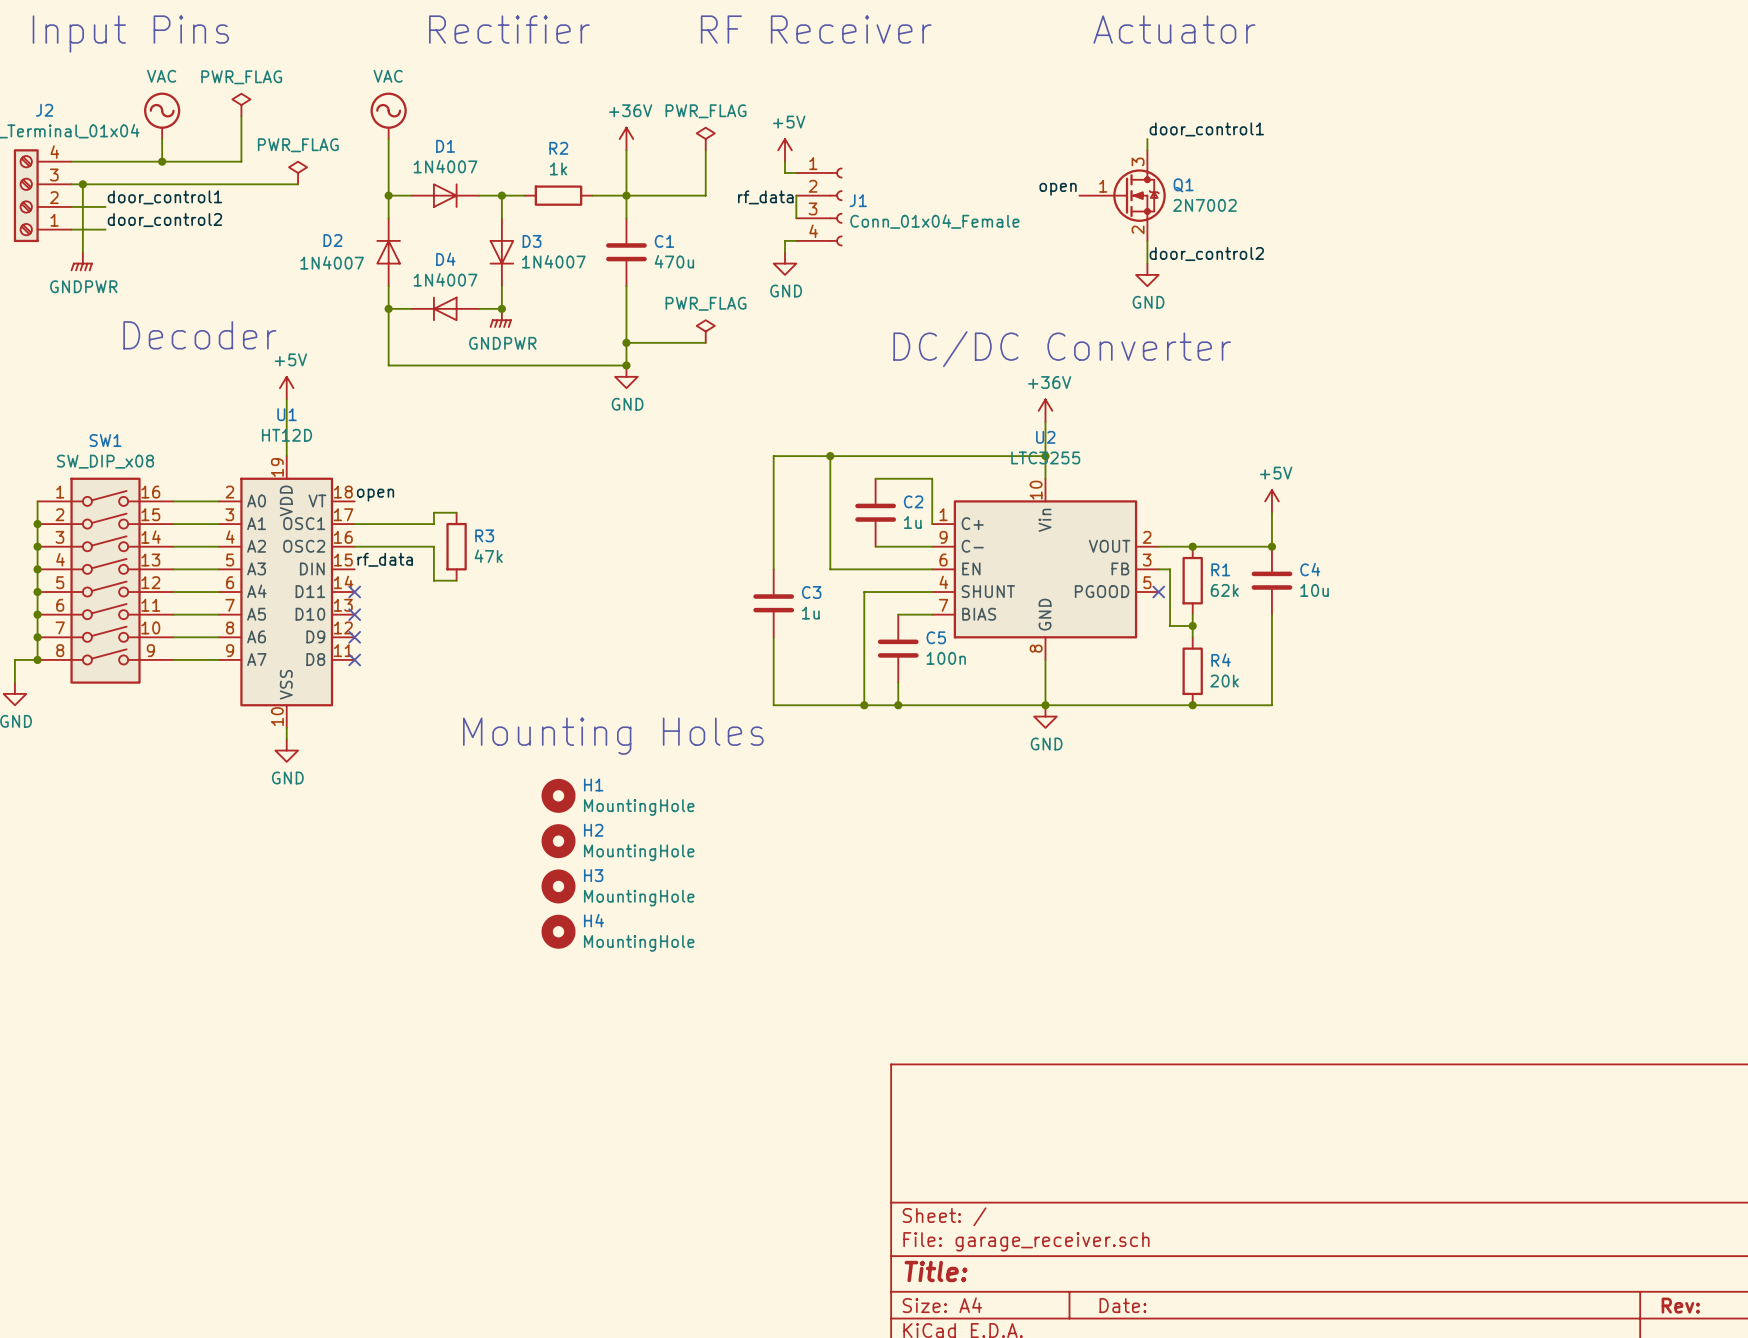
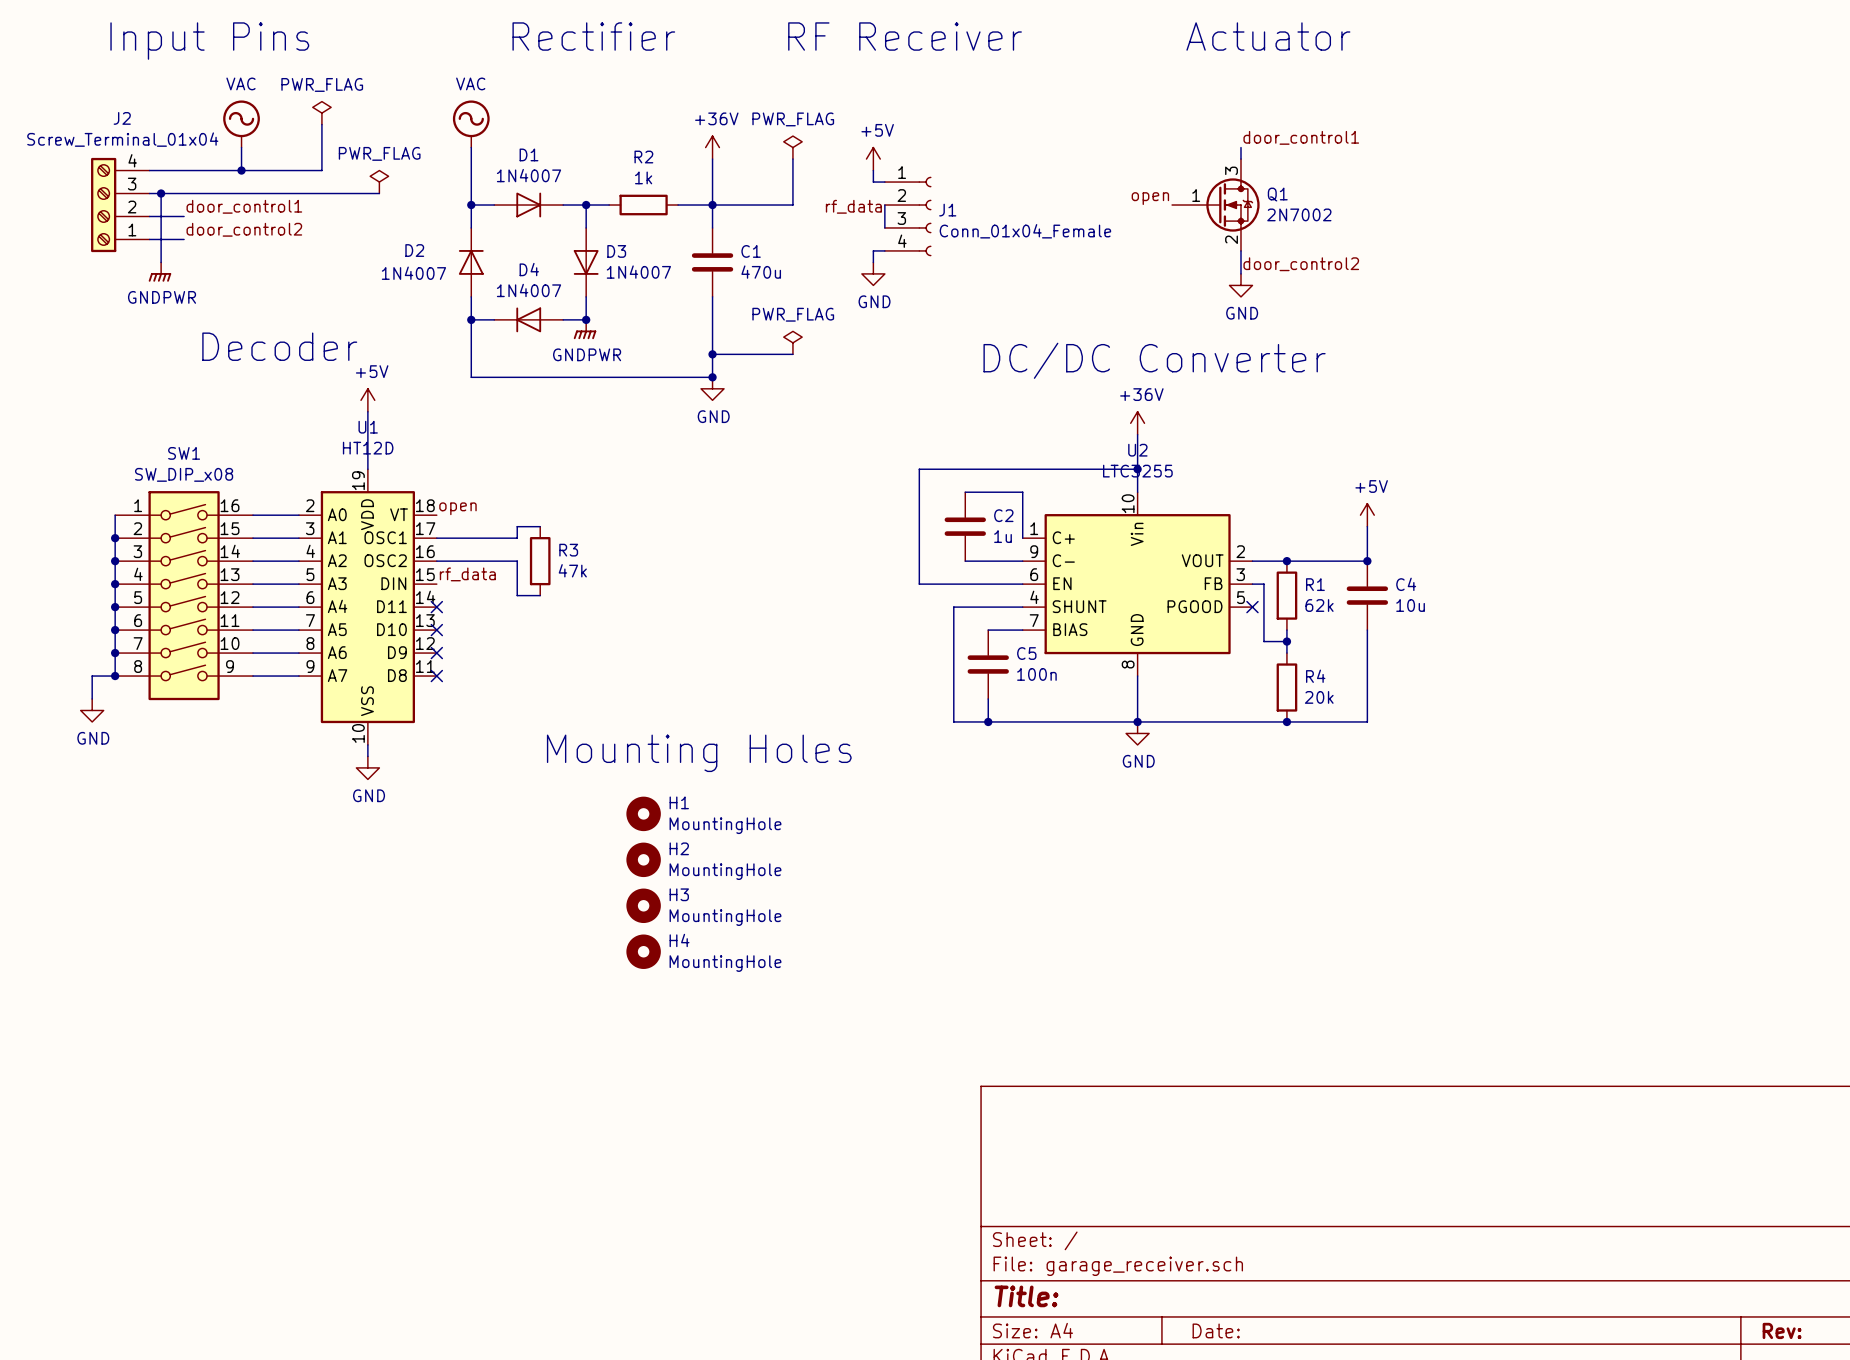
wire: (830, 456) (773, 456) (773, 569) -> none
junction: (830, 456) -> none
C3: 1u (773, 603) -> none
wire: (773, 637) (773, 705) (864, 705) -> none
junction: (864, 705) -> none

